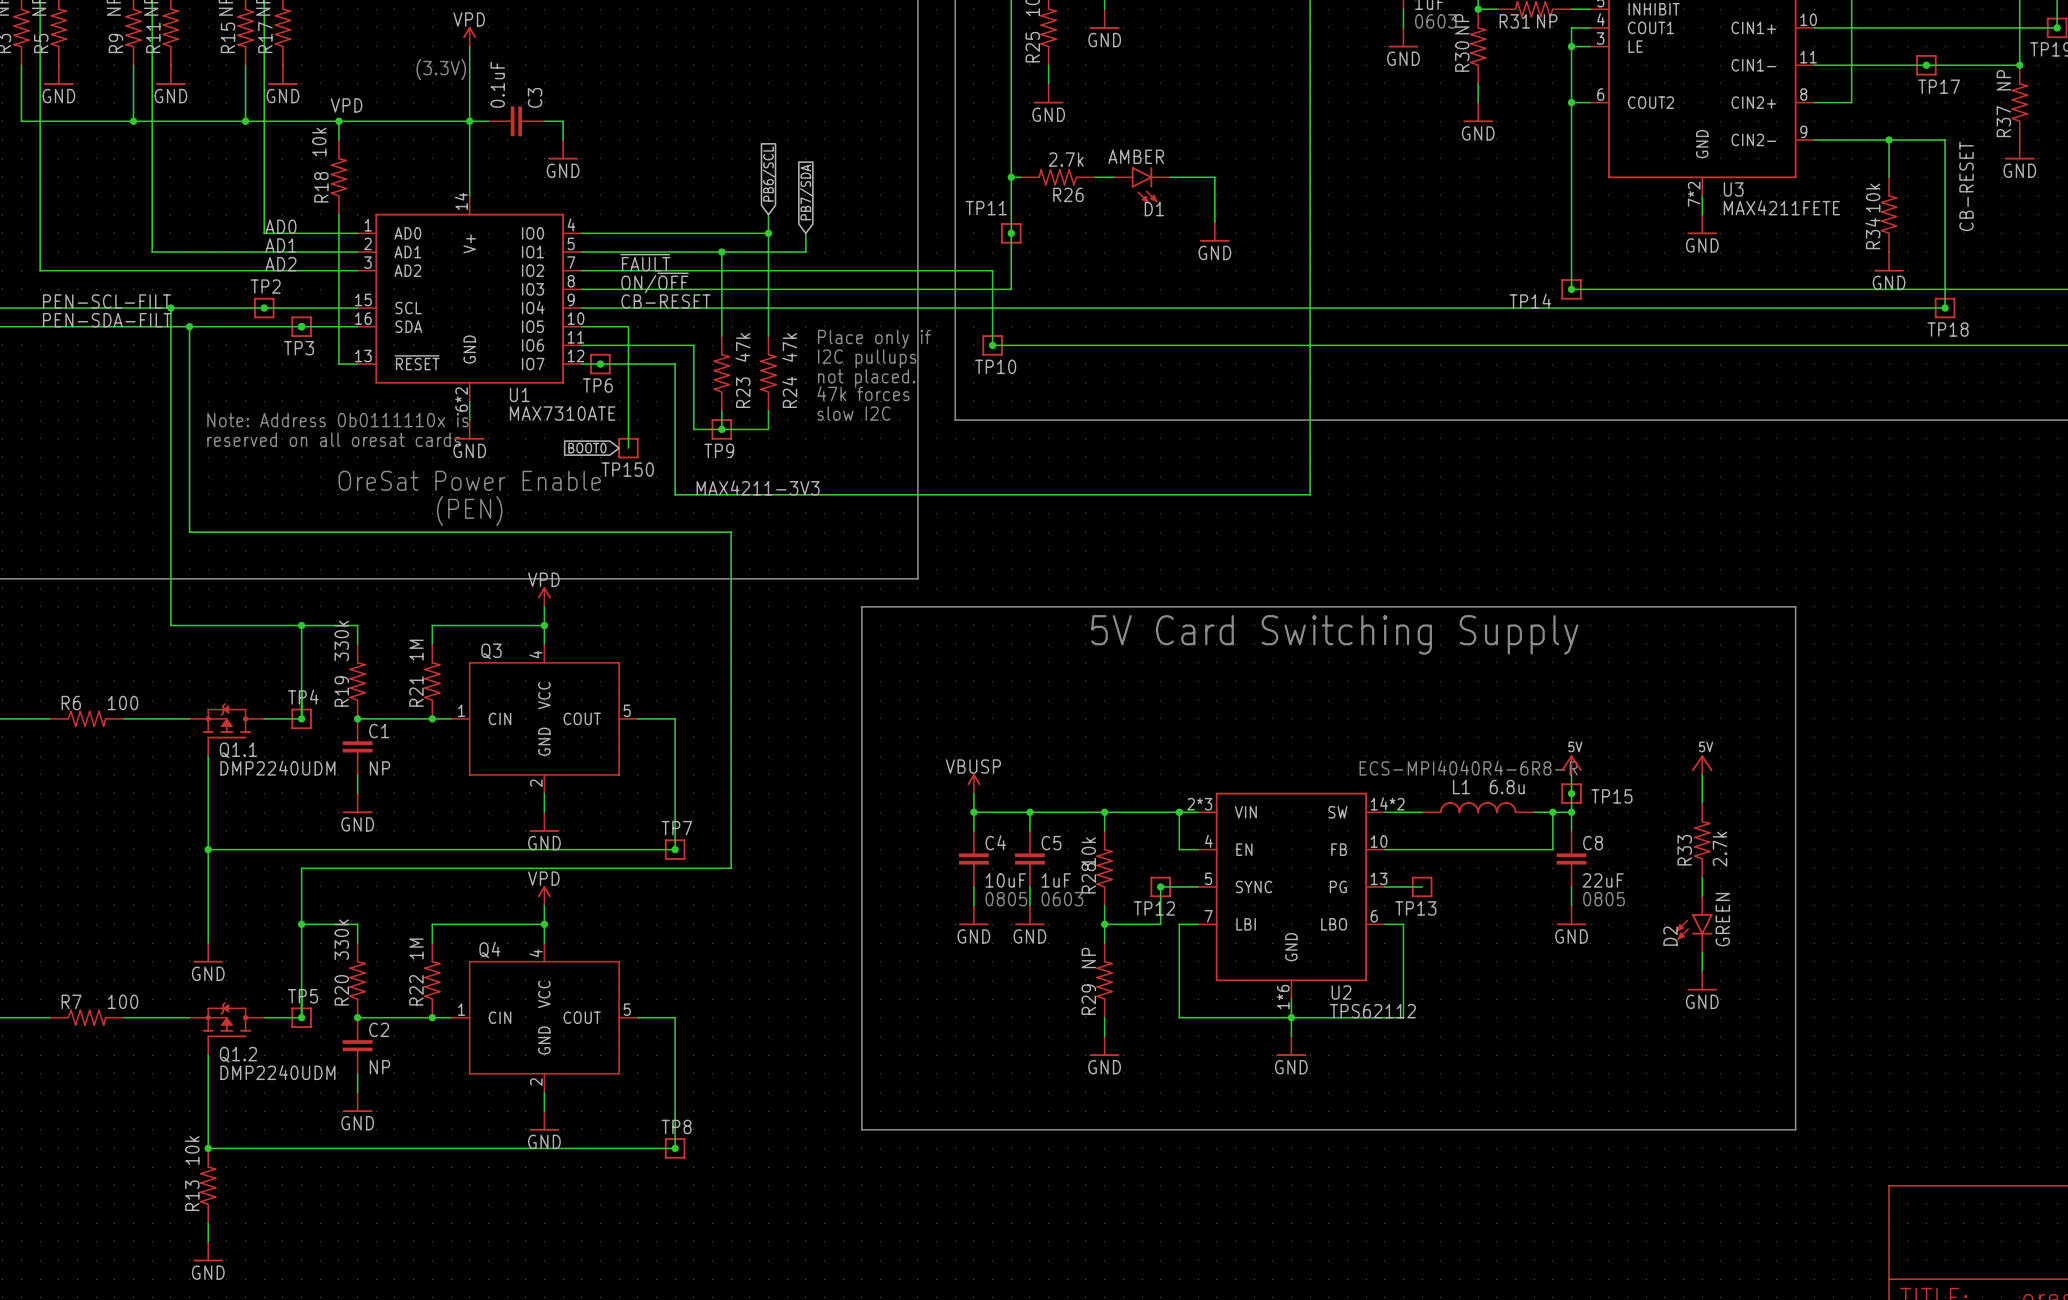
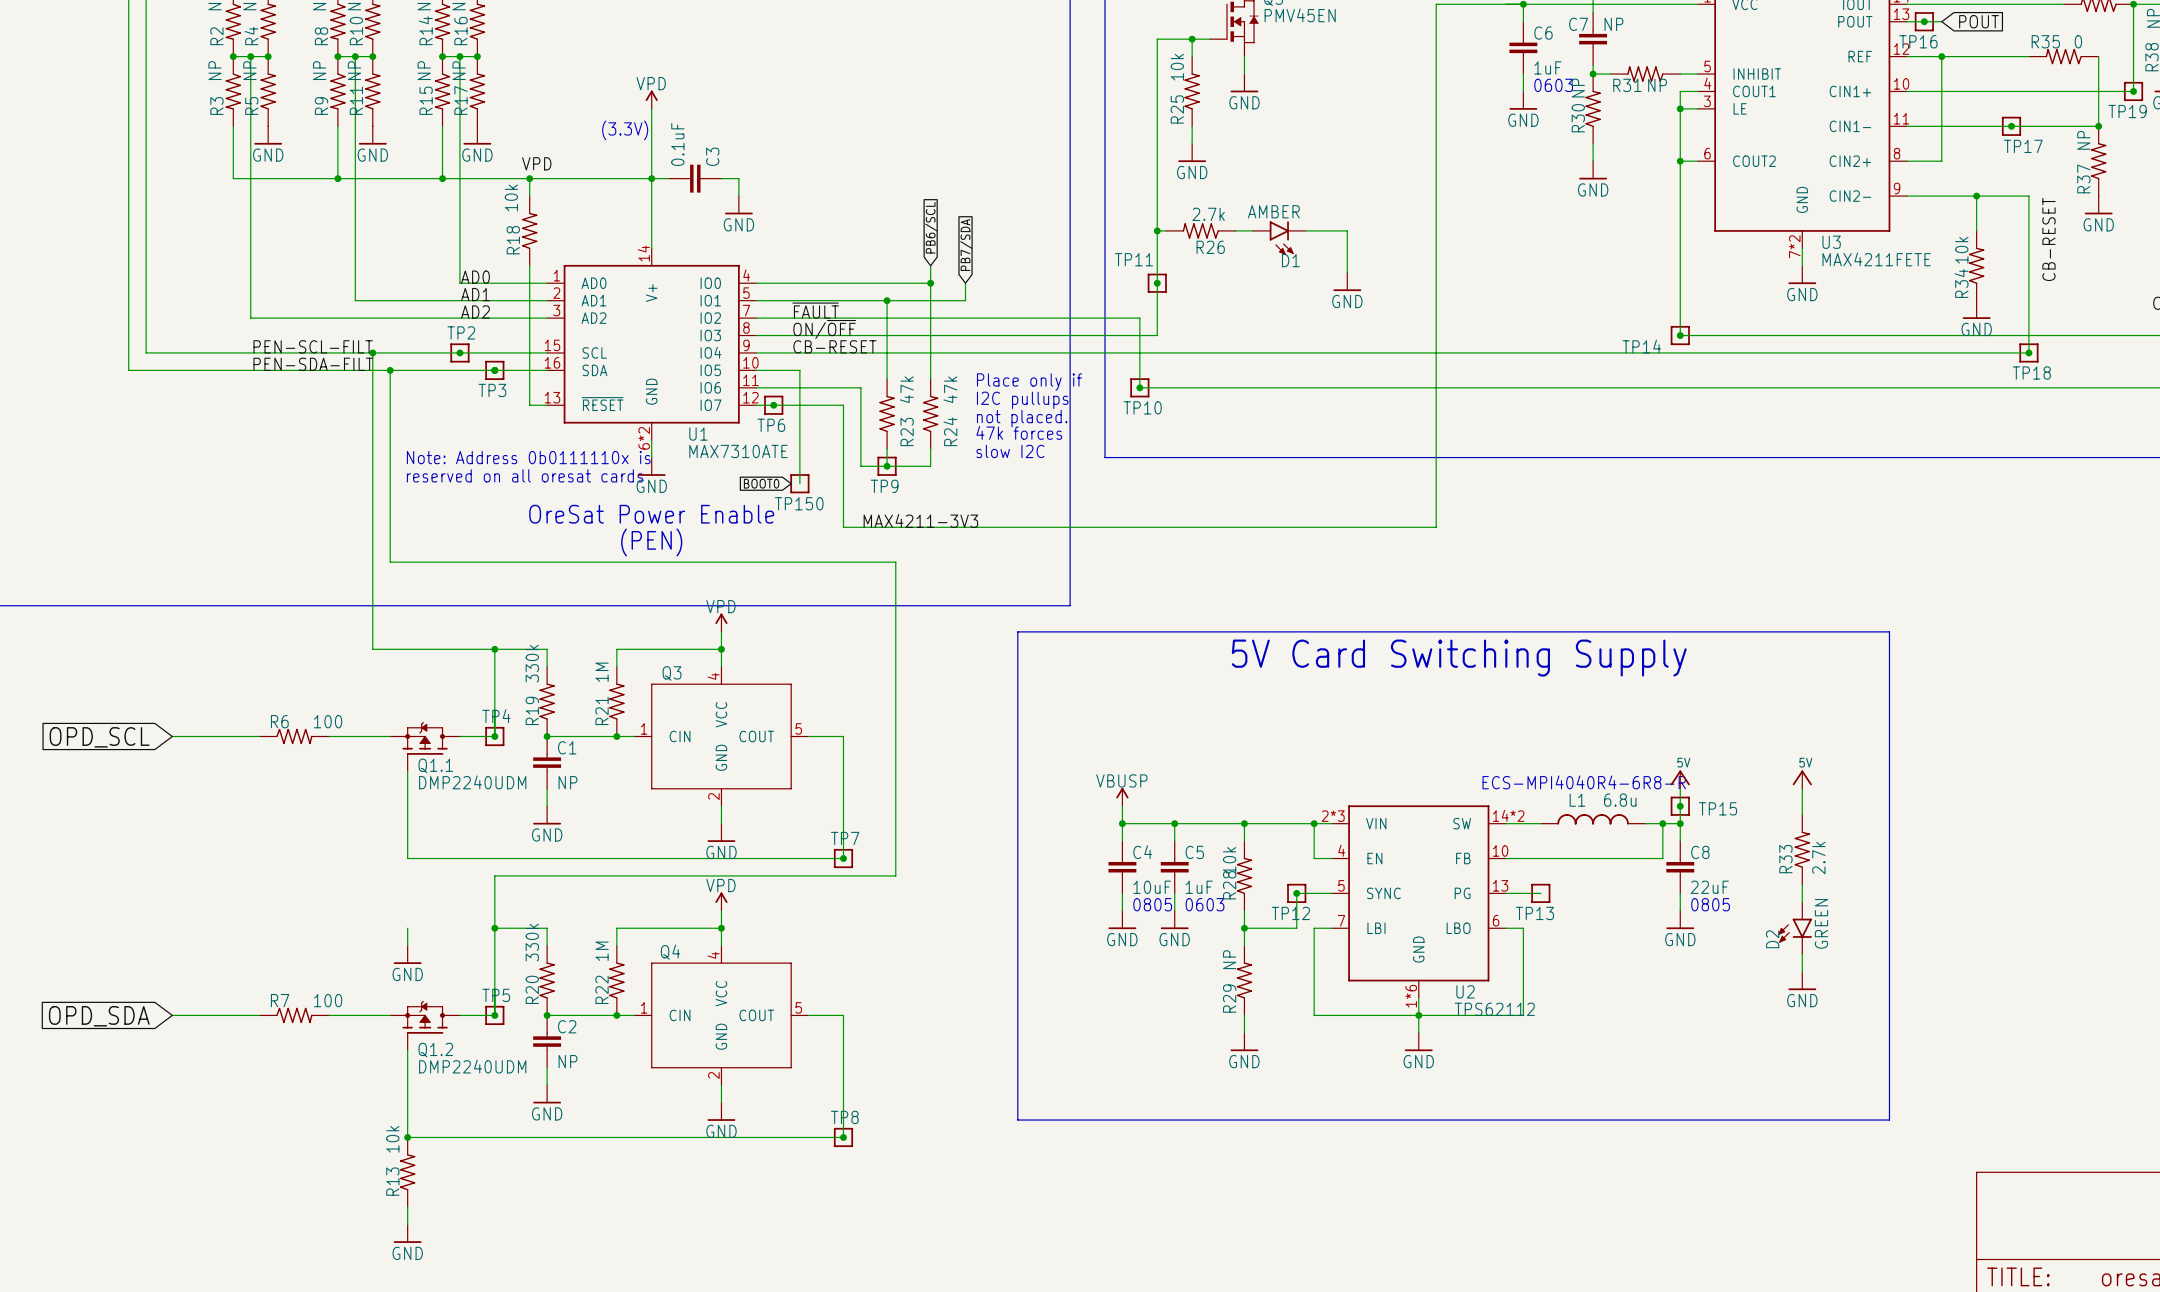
wire: (208, 849) (208, 924) -> none
junction: (208, 849) -> none

